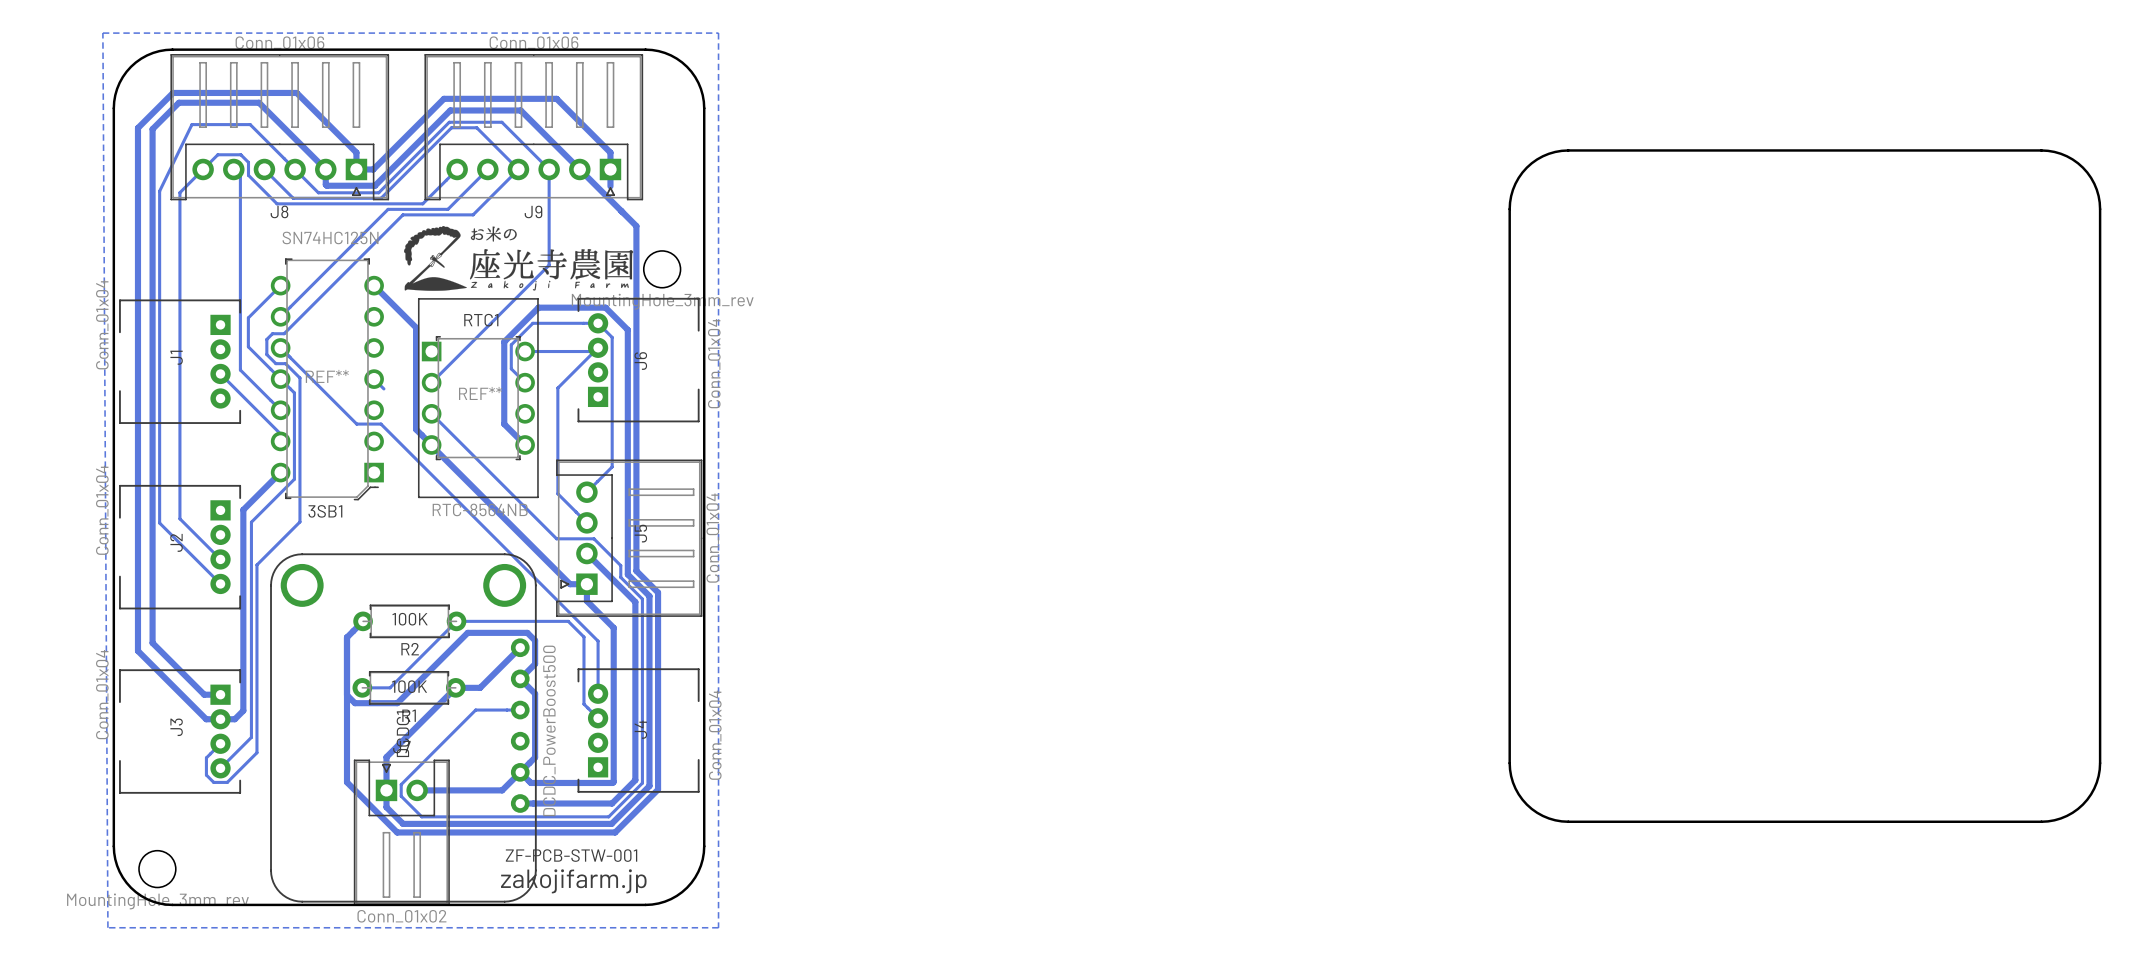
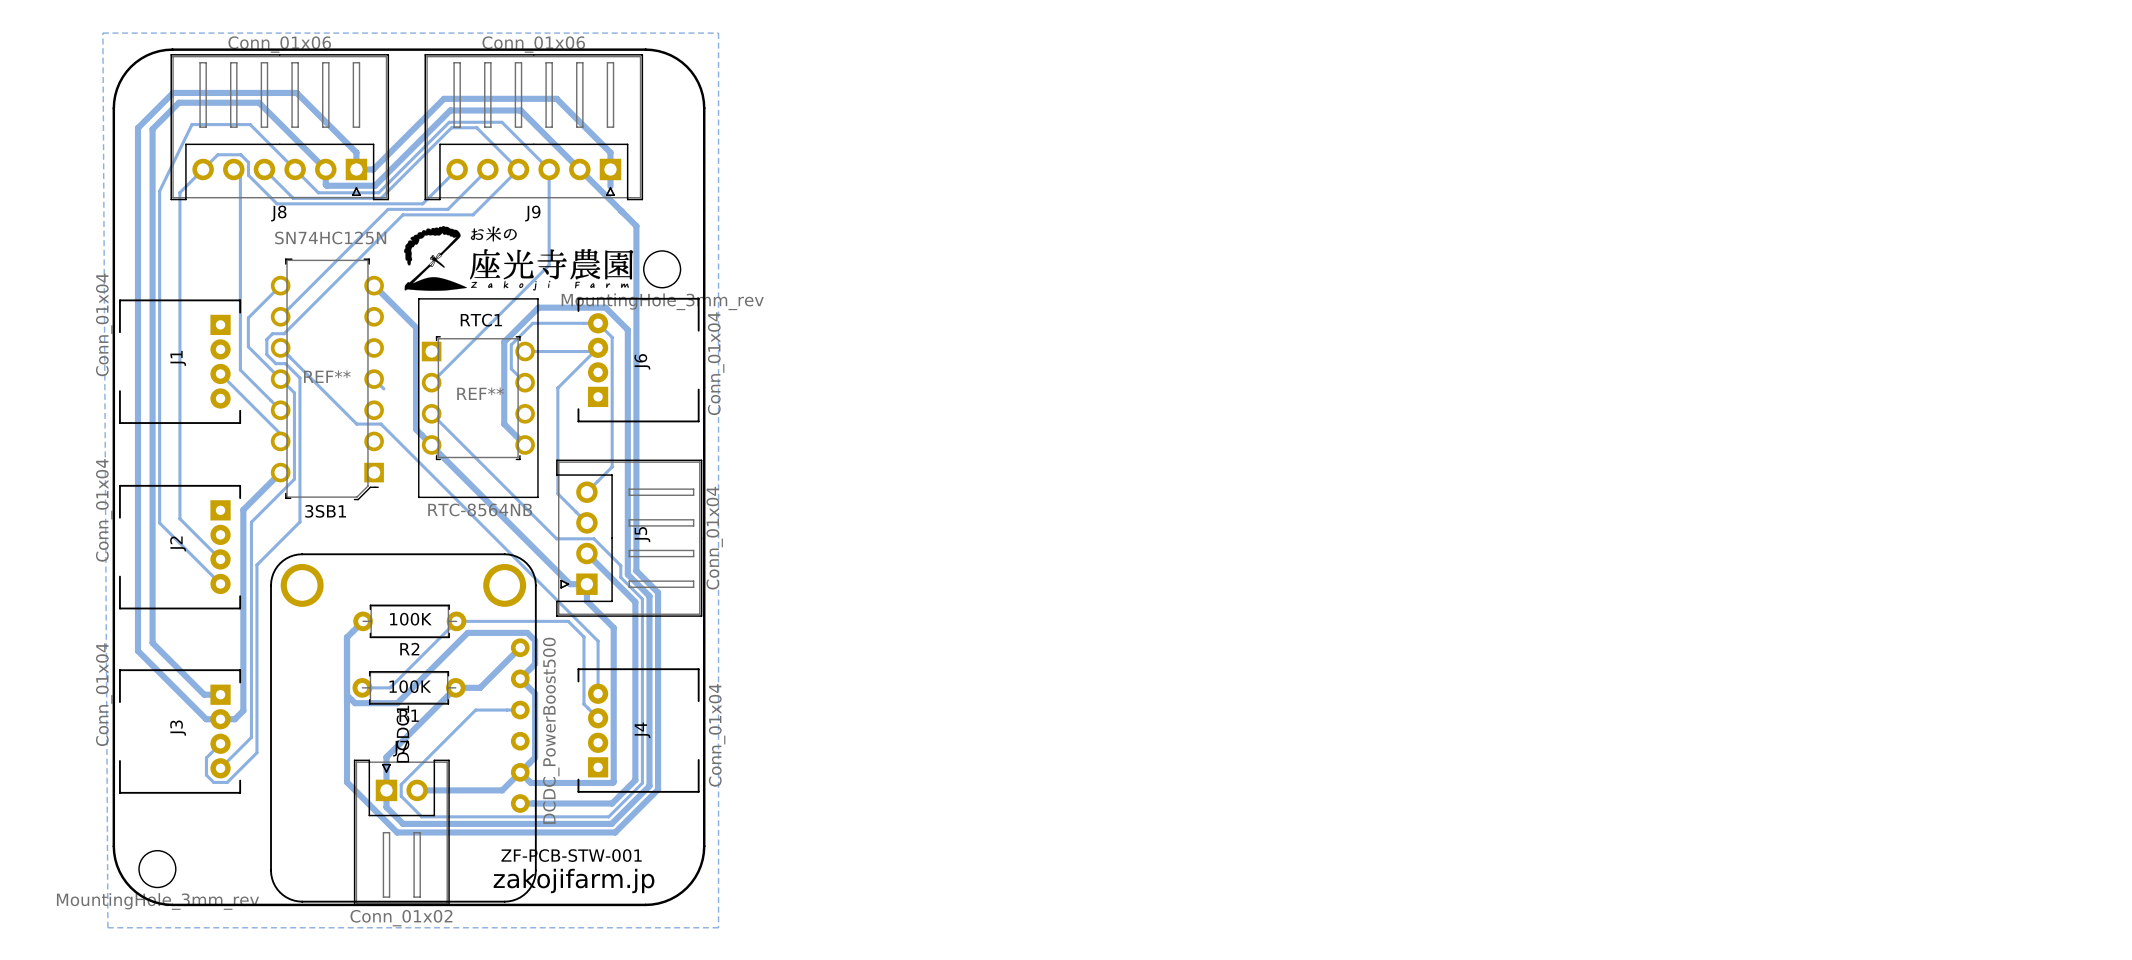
board edge: (1568, 150) (2041, 150) (2066, 156) (2087, 172) (2096, 189) (2100, 209) (2100, 763) (2094, 788) (2078, 808) (2060, 818) (2041, 821) (1568, 821) (1542, 815) (1522, 799) (1512, 782) (1509, 763) (1510, 202) (1515, 183) (1526, 167) (1542, 156) (1568, 150) -> none

